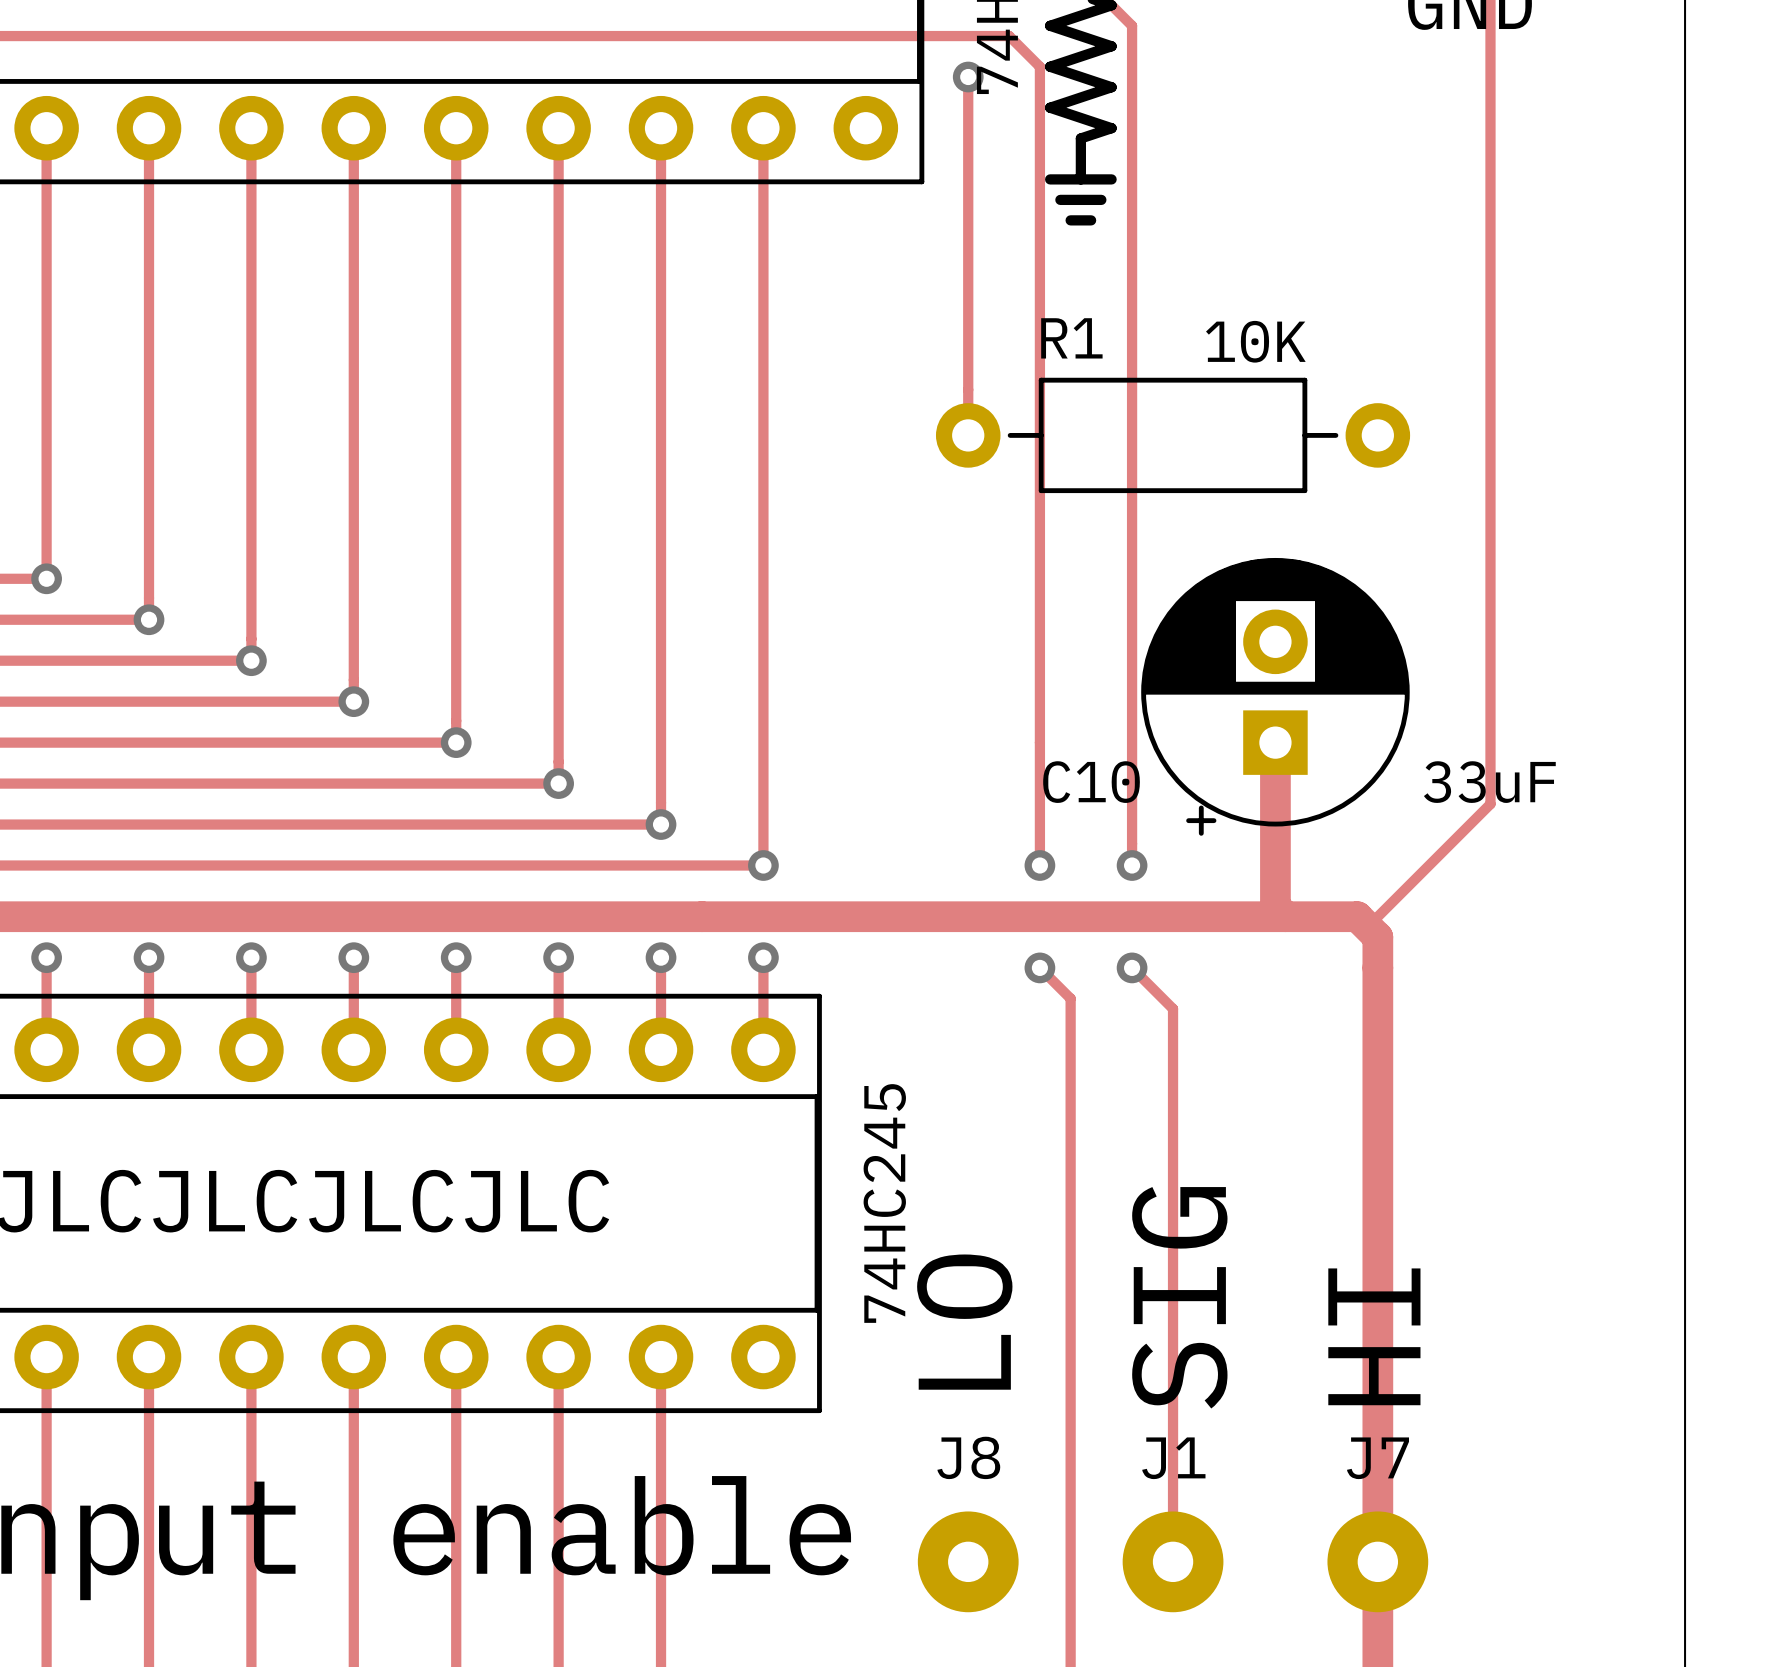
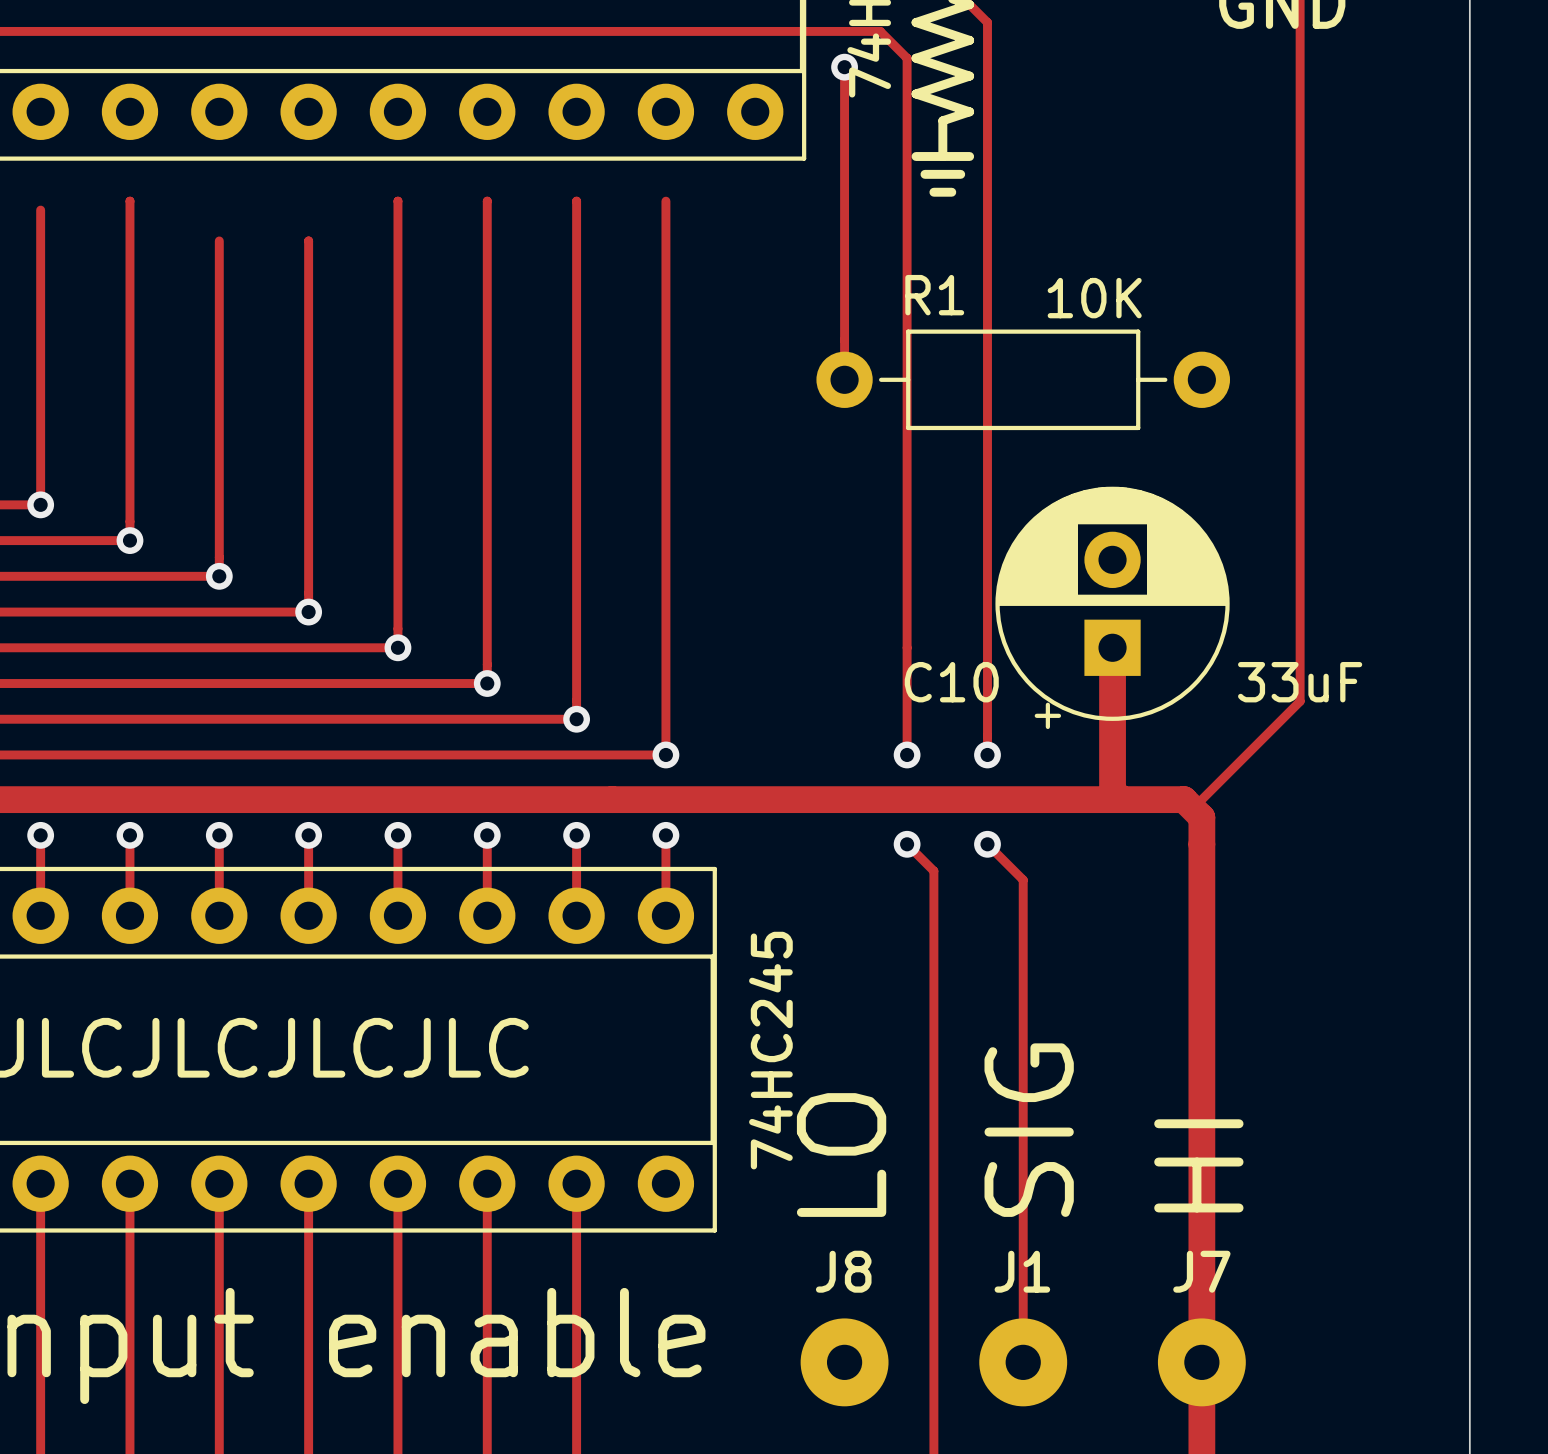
track: (46, 128) (46, 240) -> none
track: (149, 128) (149, 230) -> none
track: (251, 128) (251, 276) -> none
track: (353, 128) (353, 276) -> none
track: (456, 128) (456, 230) -> none
track: (558, 128) (558, 230) -> none
track: (661, 128) (661, 230) -> none
track: (763, 128) (763, 230) -> none

